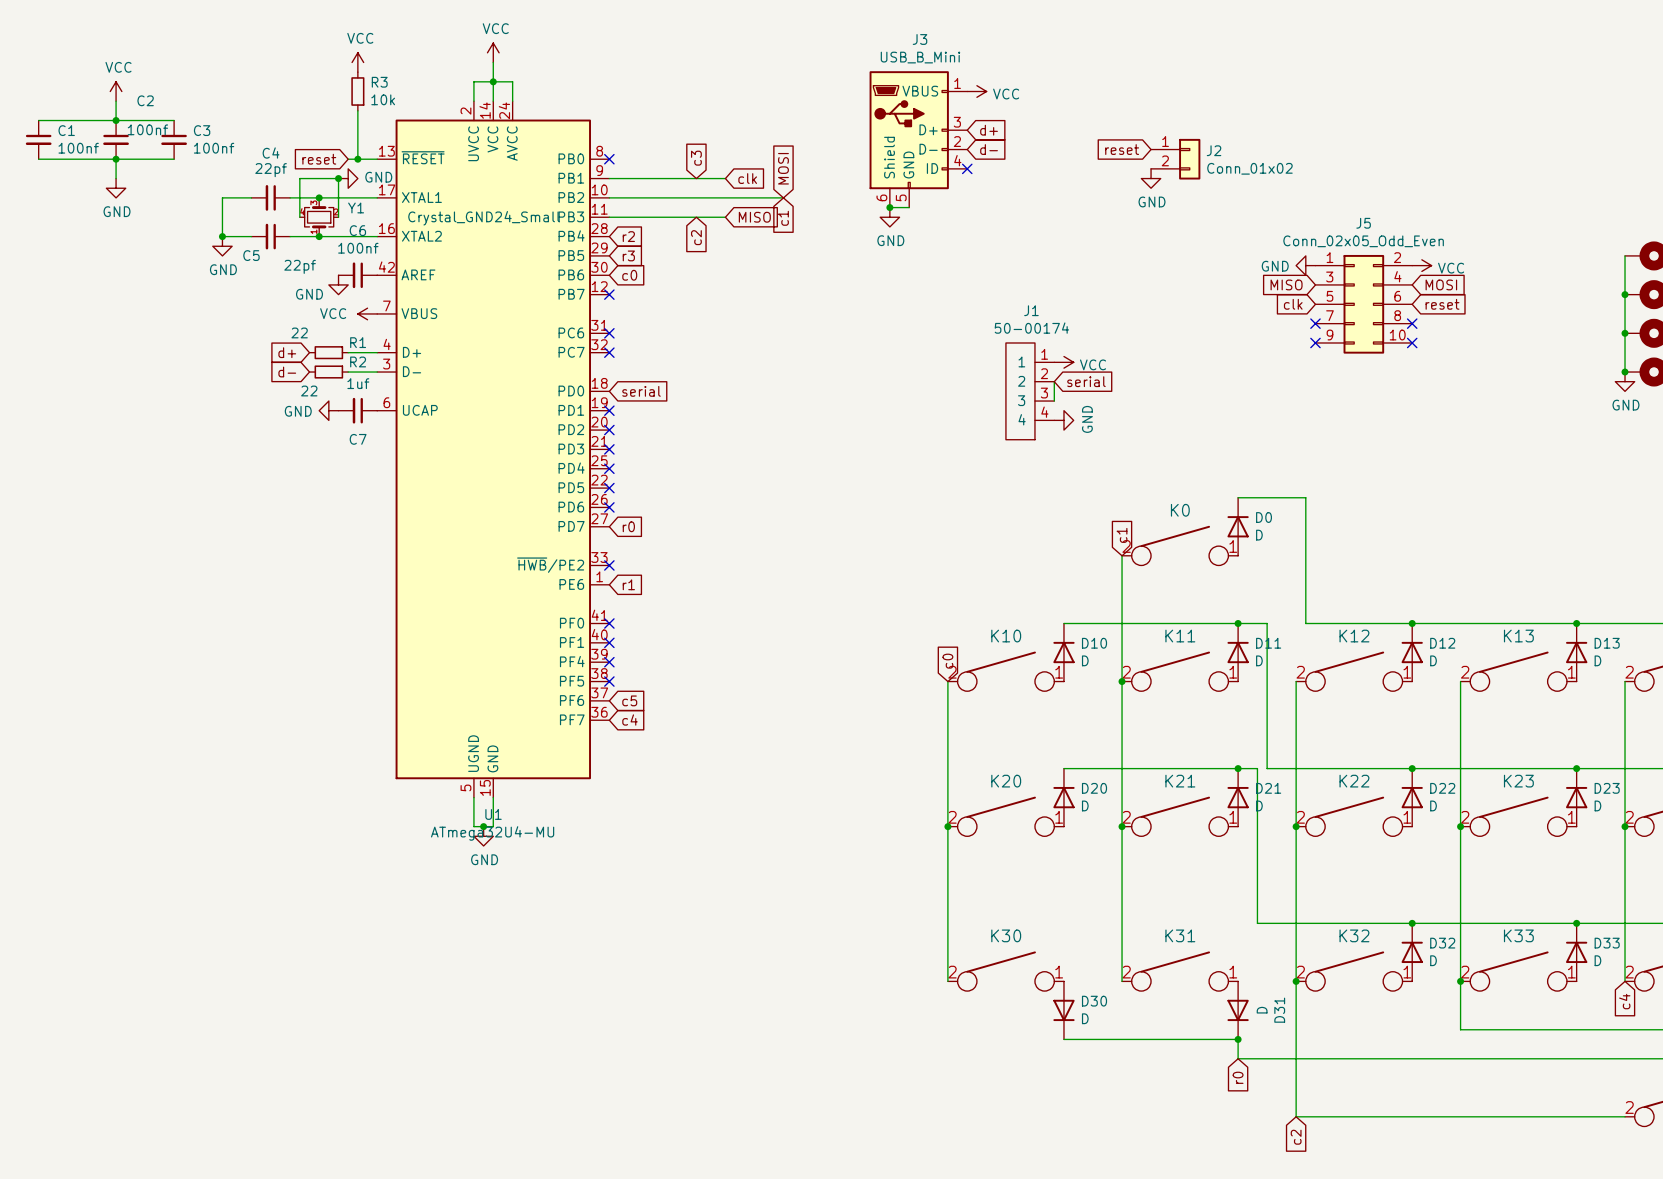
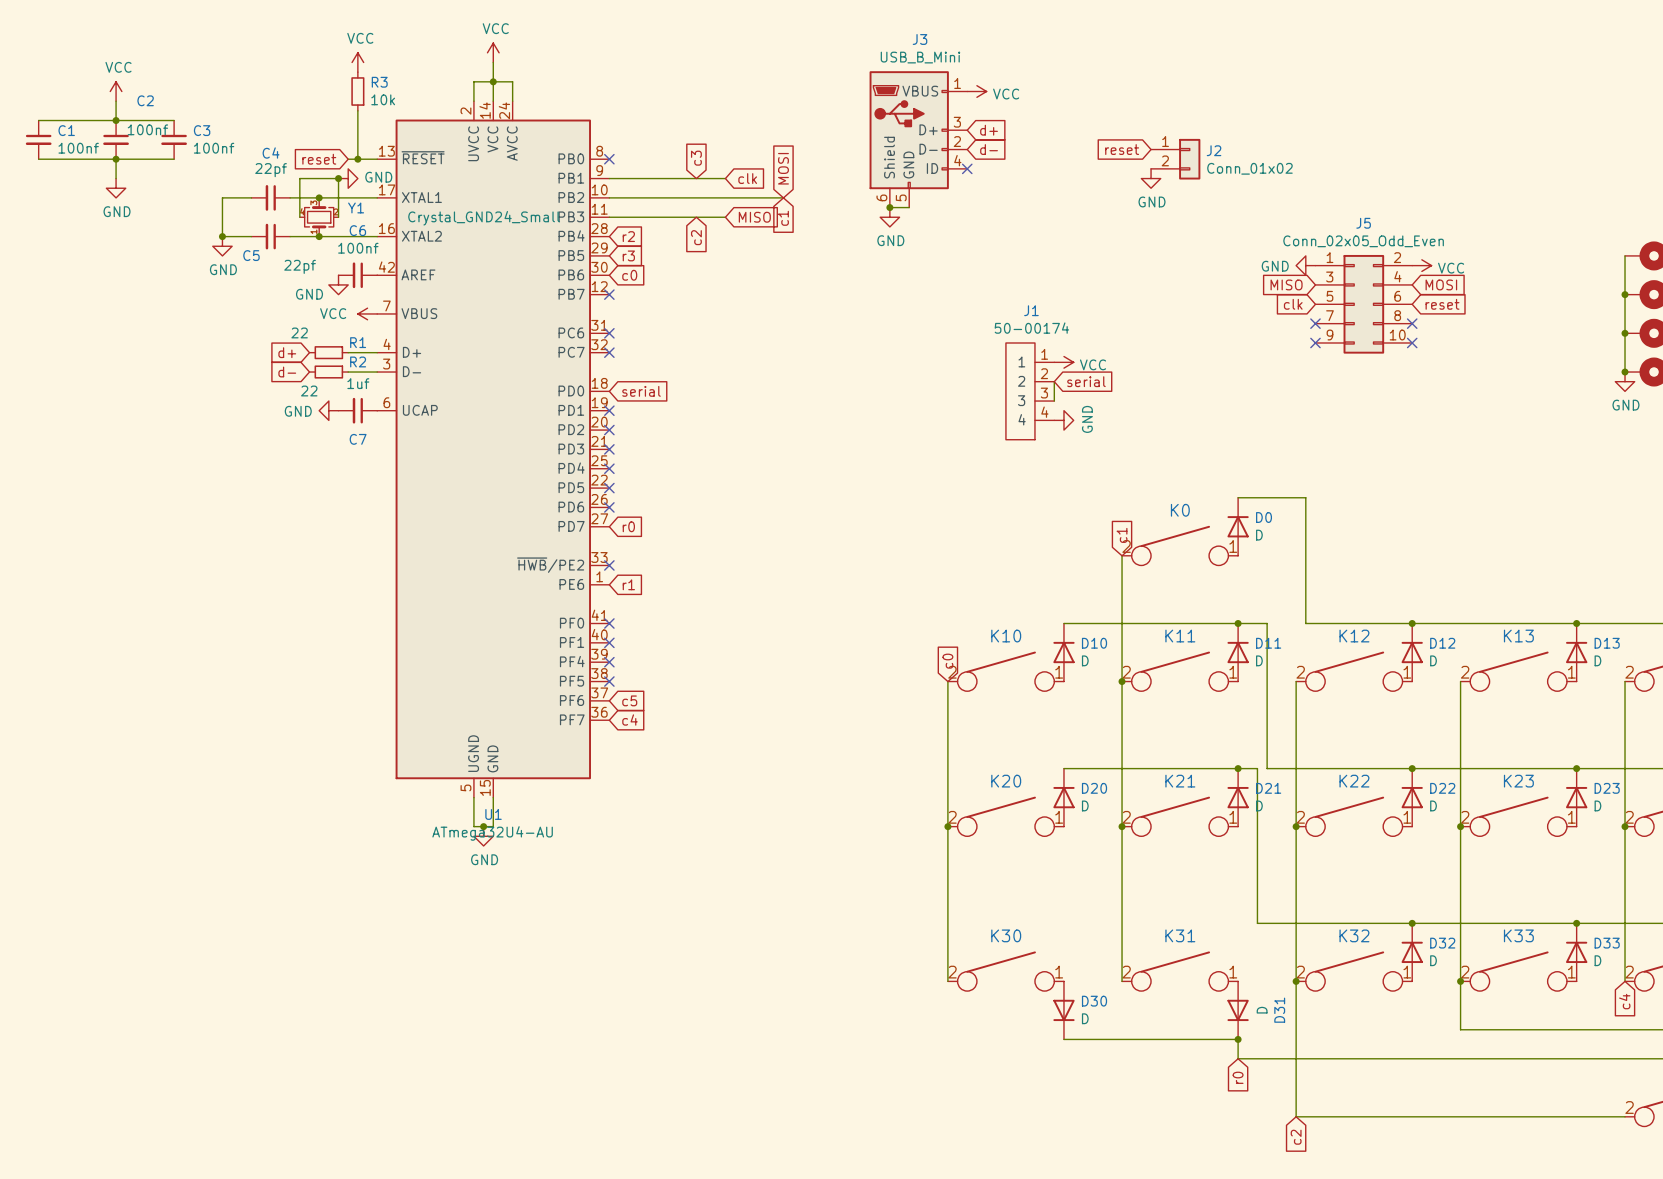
U1 value: ATmega32U4-MU (492, 833) -> ATmega32U4-AU (492, 833)

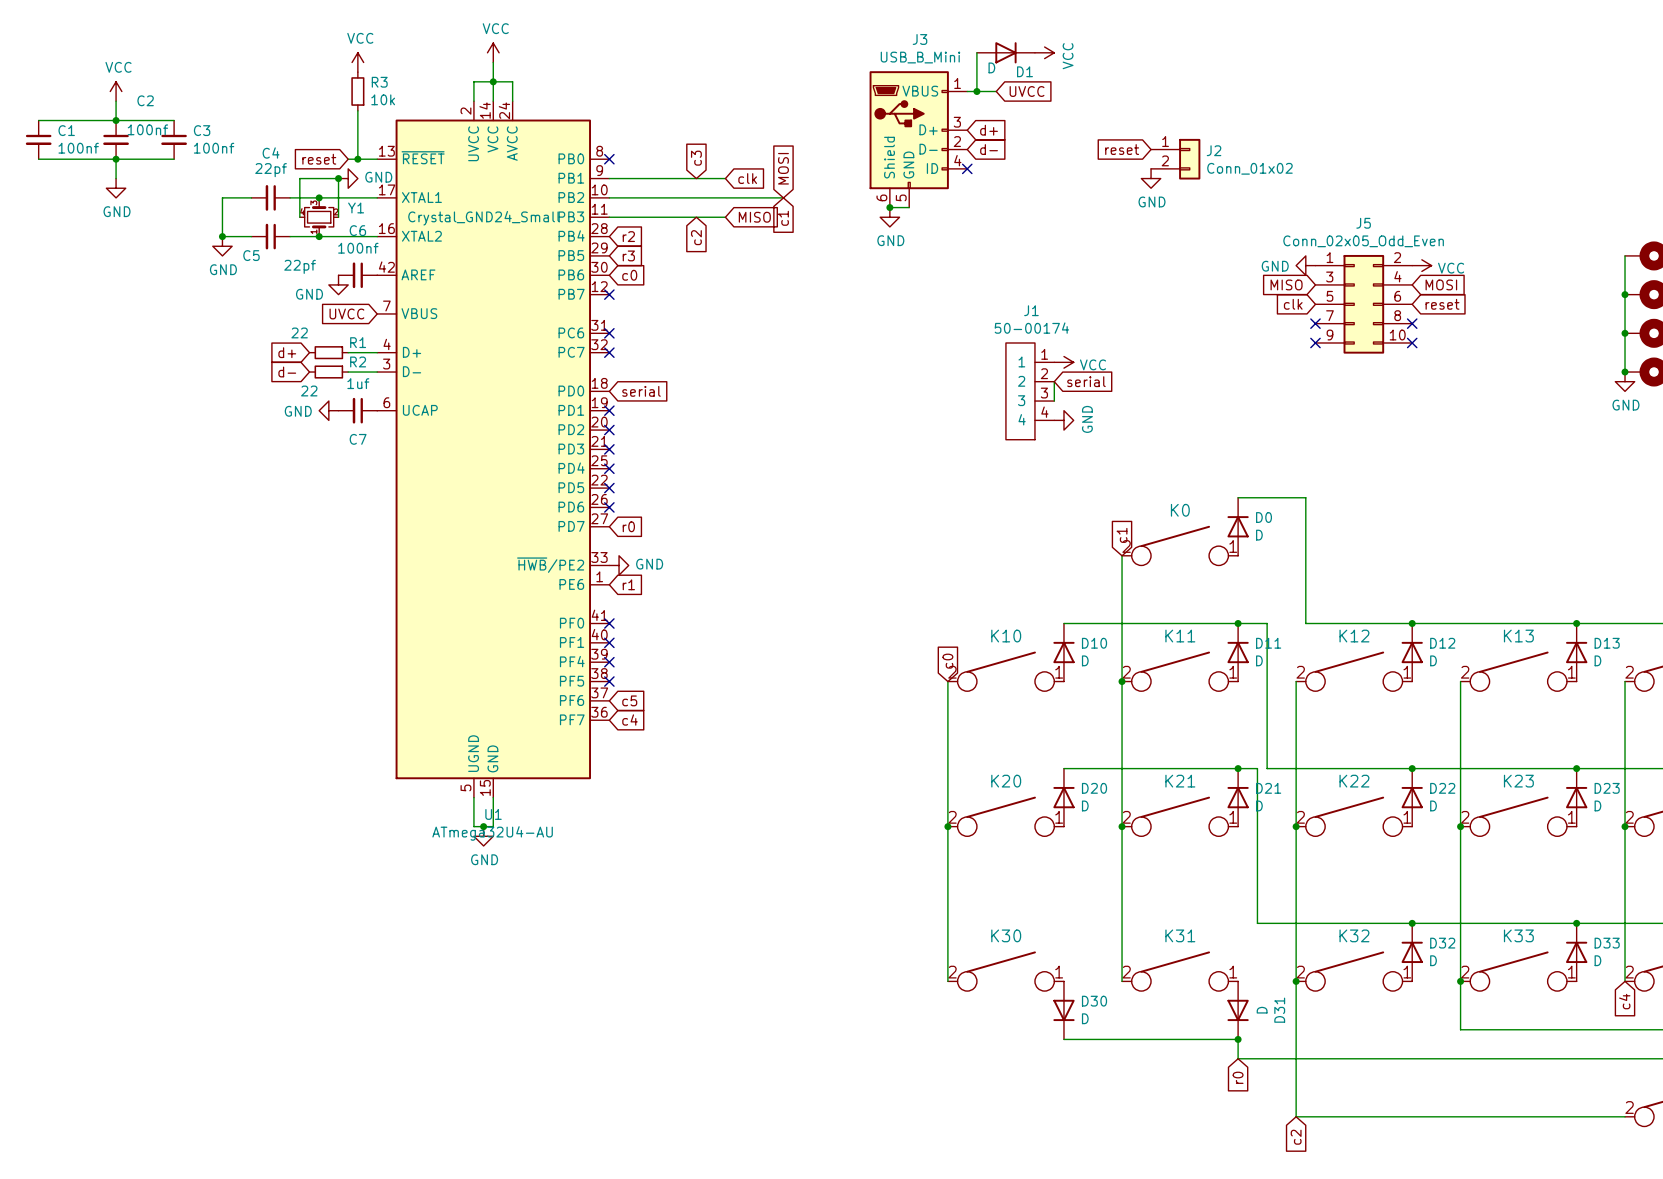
wire: none -> (976, 52) (976, 91)
D1: none -> D (1005, 52)
power symbol position: VCC (976, 91) -> VCC (1044, 52)
junction: none -> (976, 91)
global label: none -> UVCC (1027, 91)
power symbol text rotation: 0° (1006, 94) -> 90° counterclockwise (1068, 56)
global label: none -> UVCC (346, 313)
power symbol: VCC (367, 313) -> none
no-connect mark: (609, 565) -> none
power symbol: none -> GND (619, 565)

